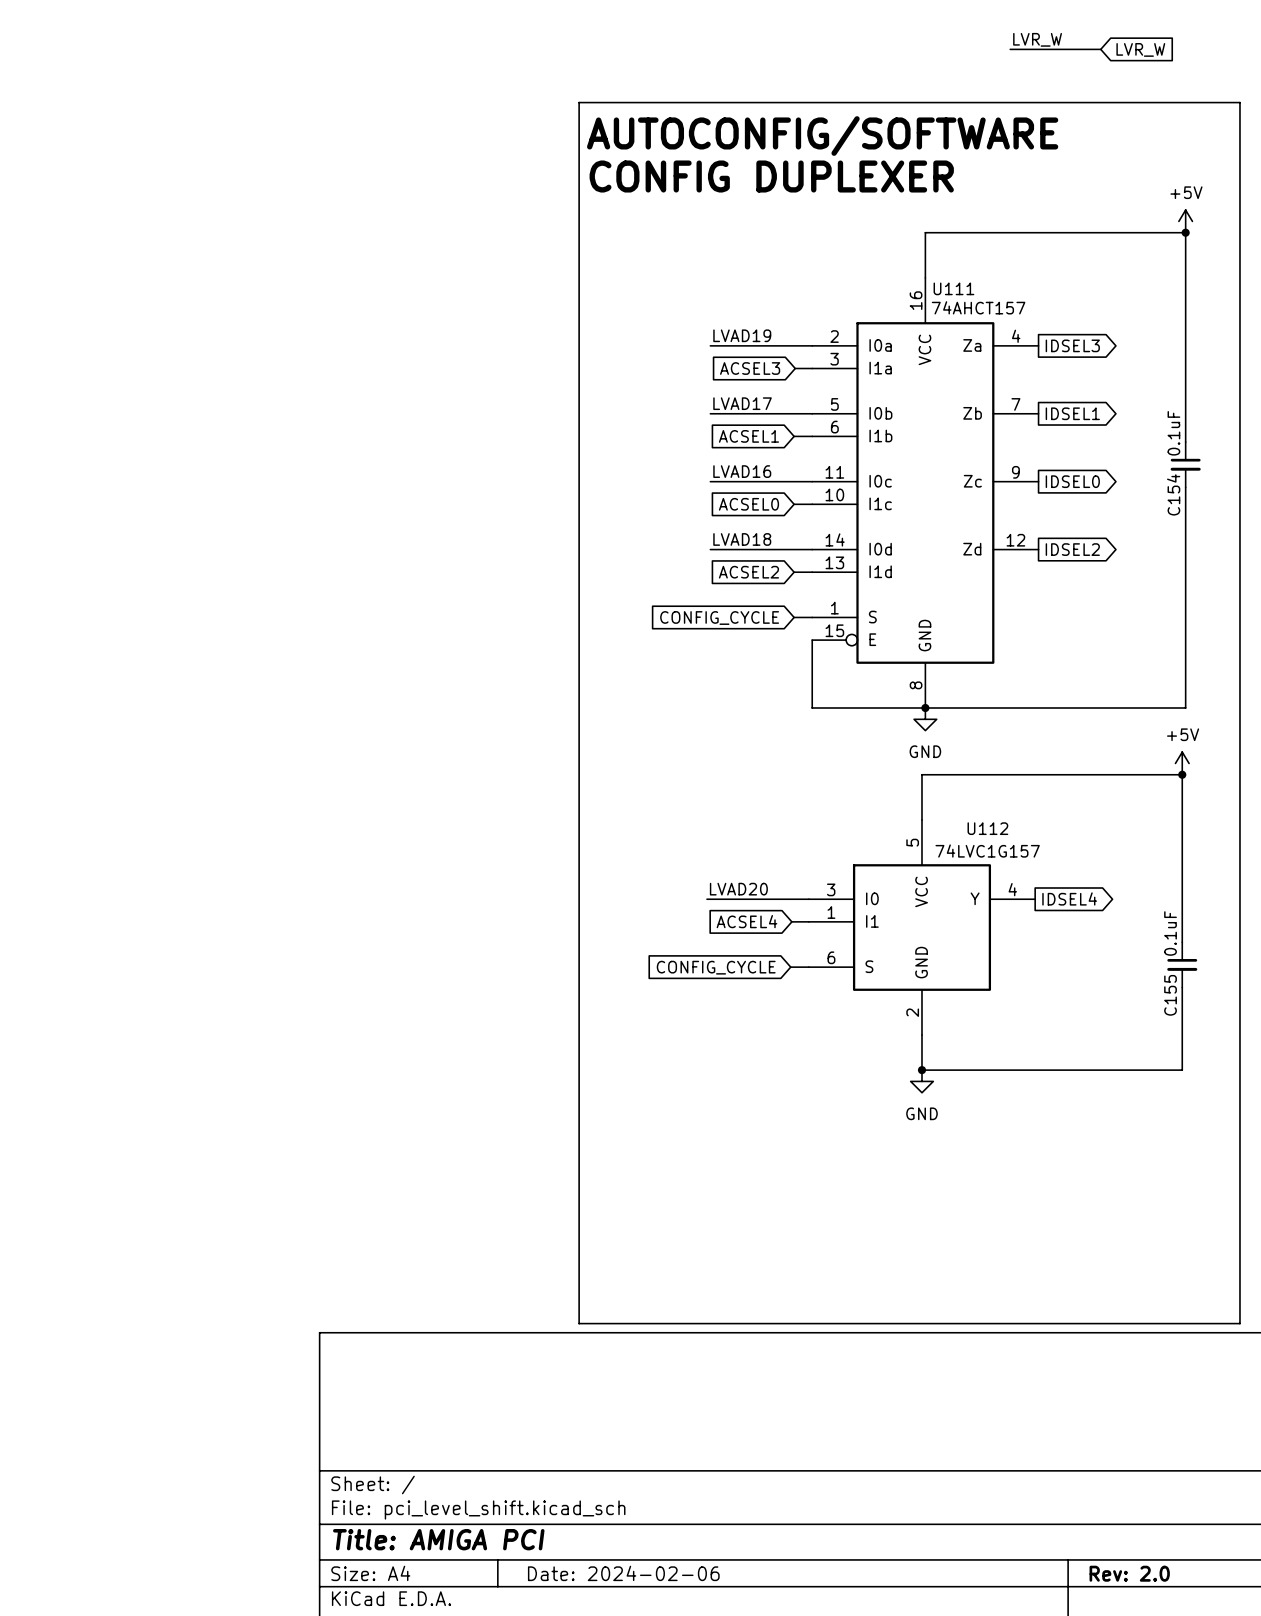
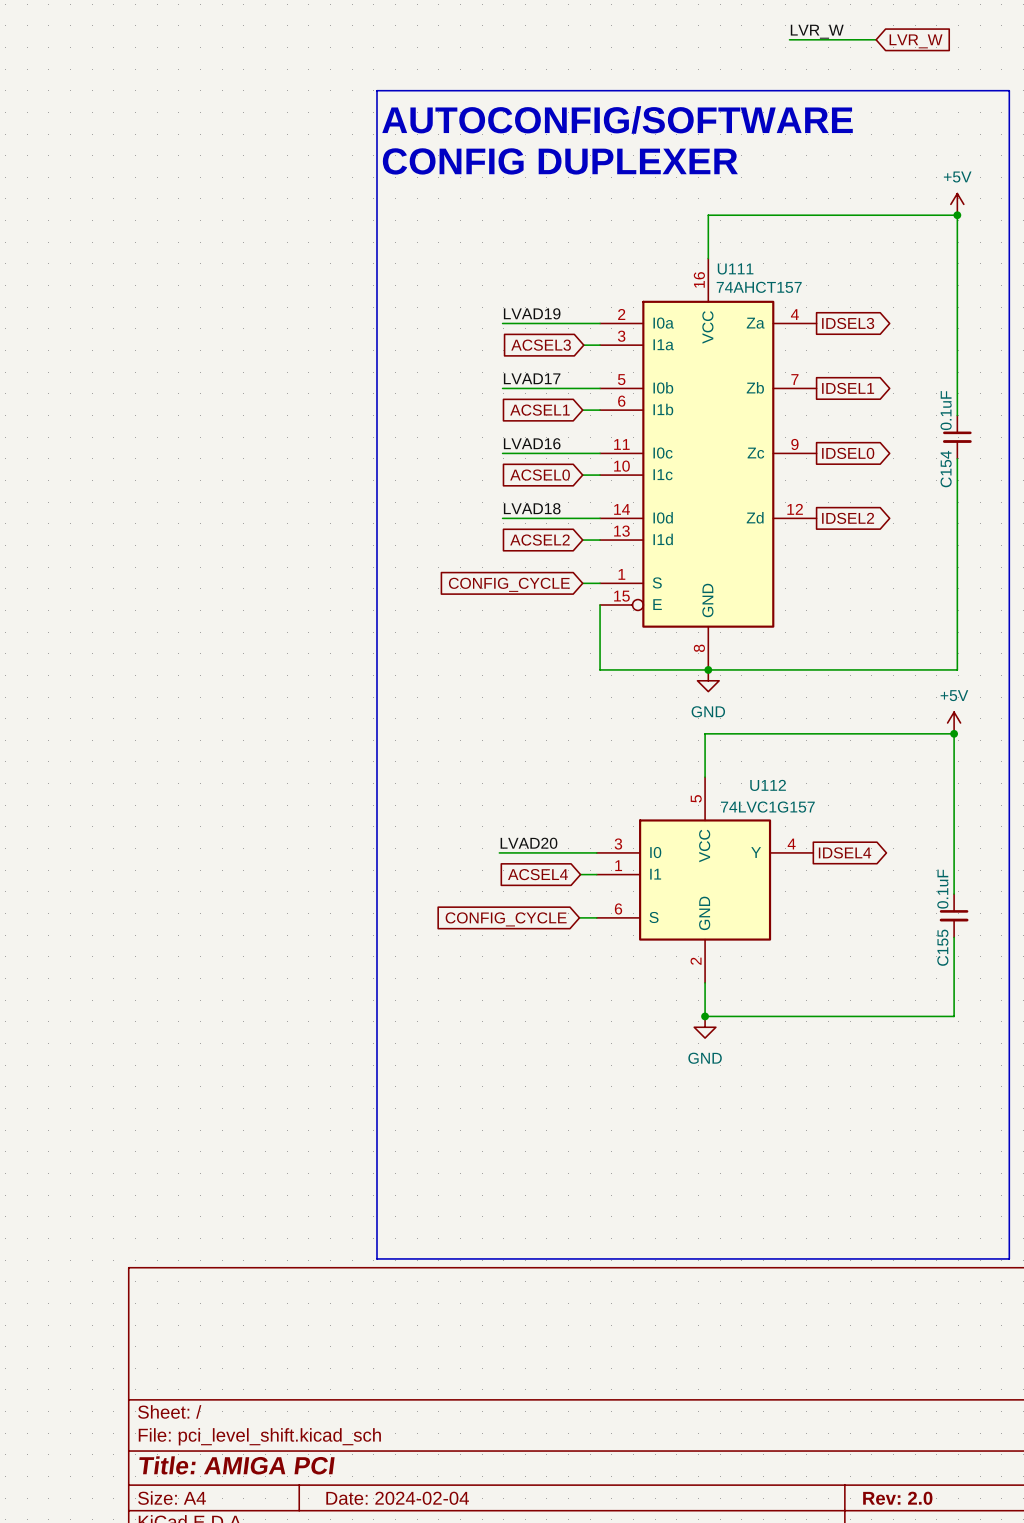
title block: Date: 2024-02-06 (623, 1573) -> Date: 2024-02-04 (397, 1498)

